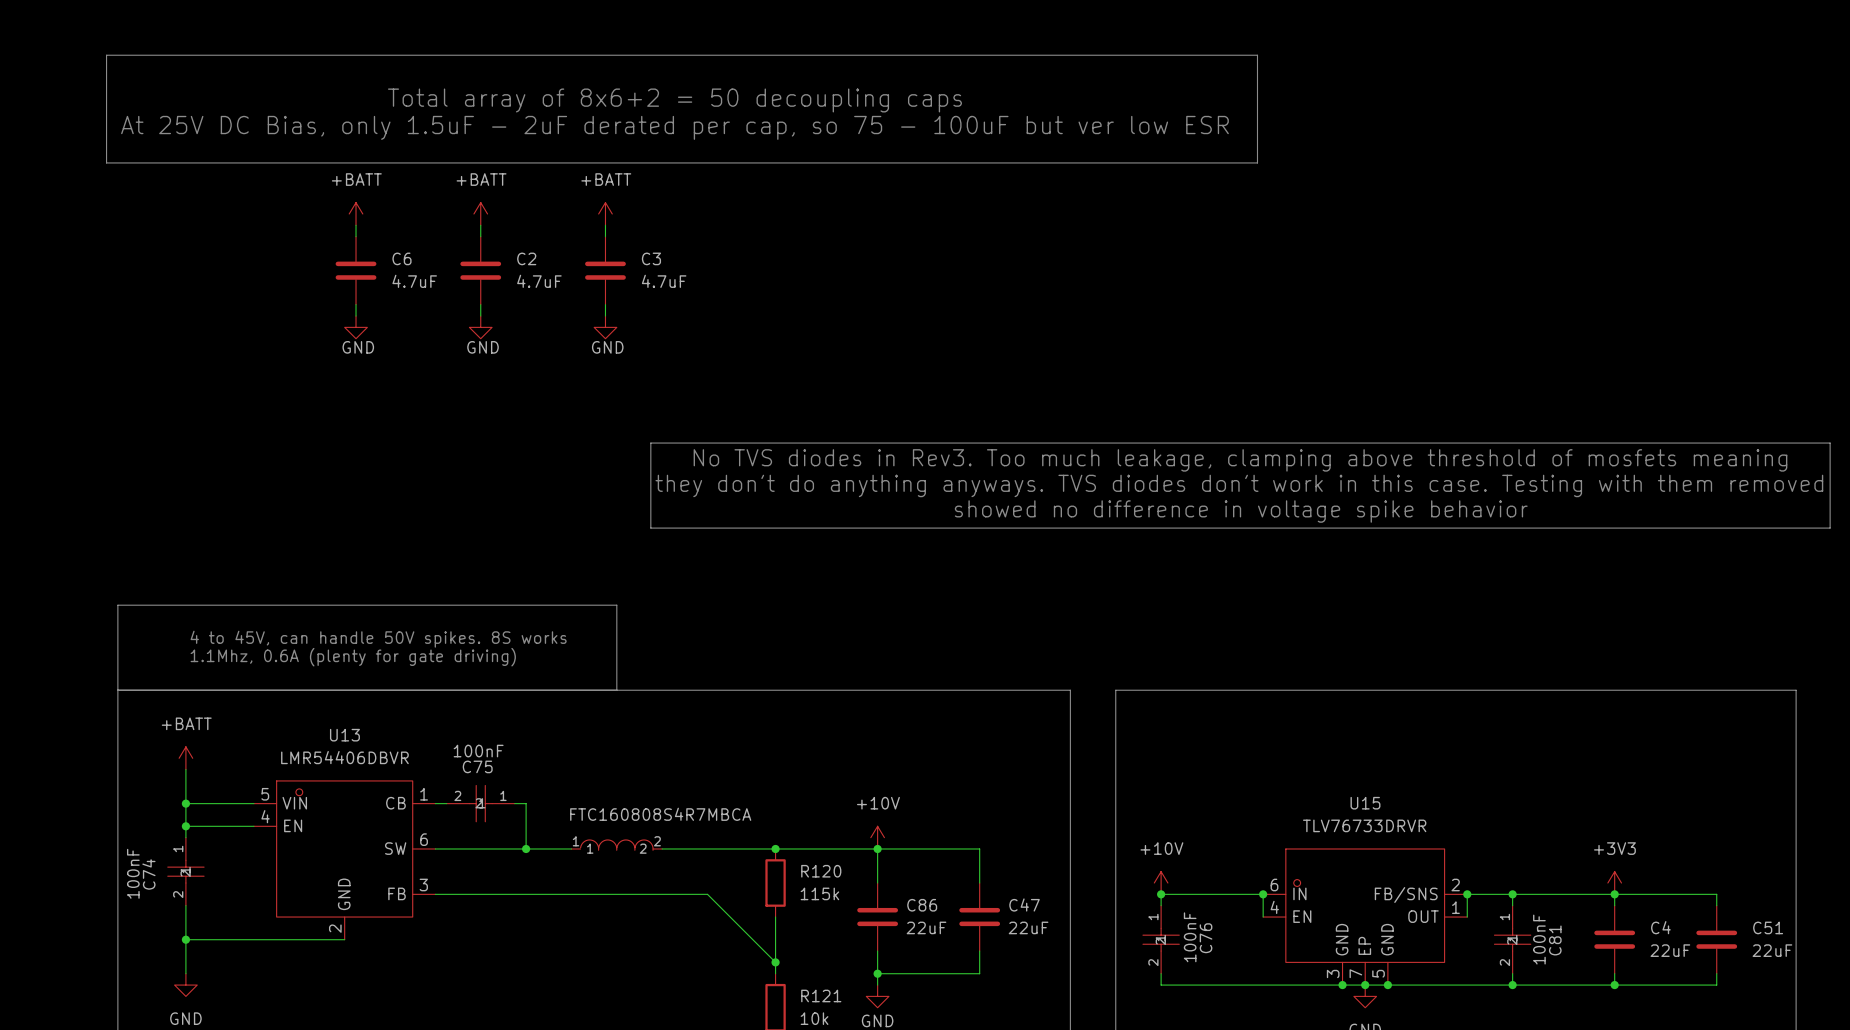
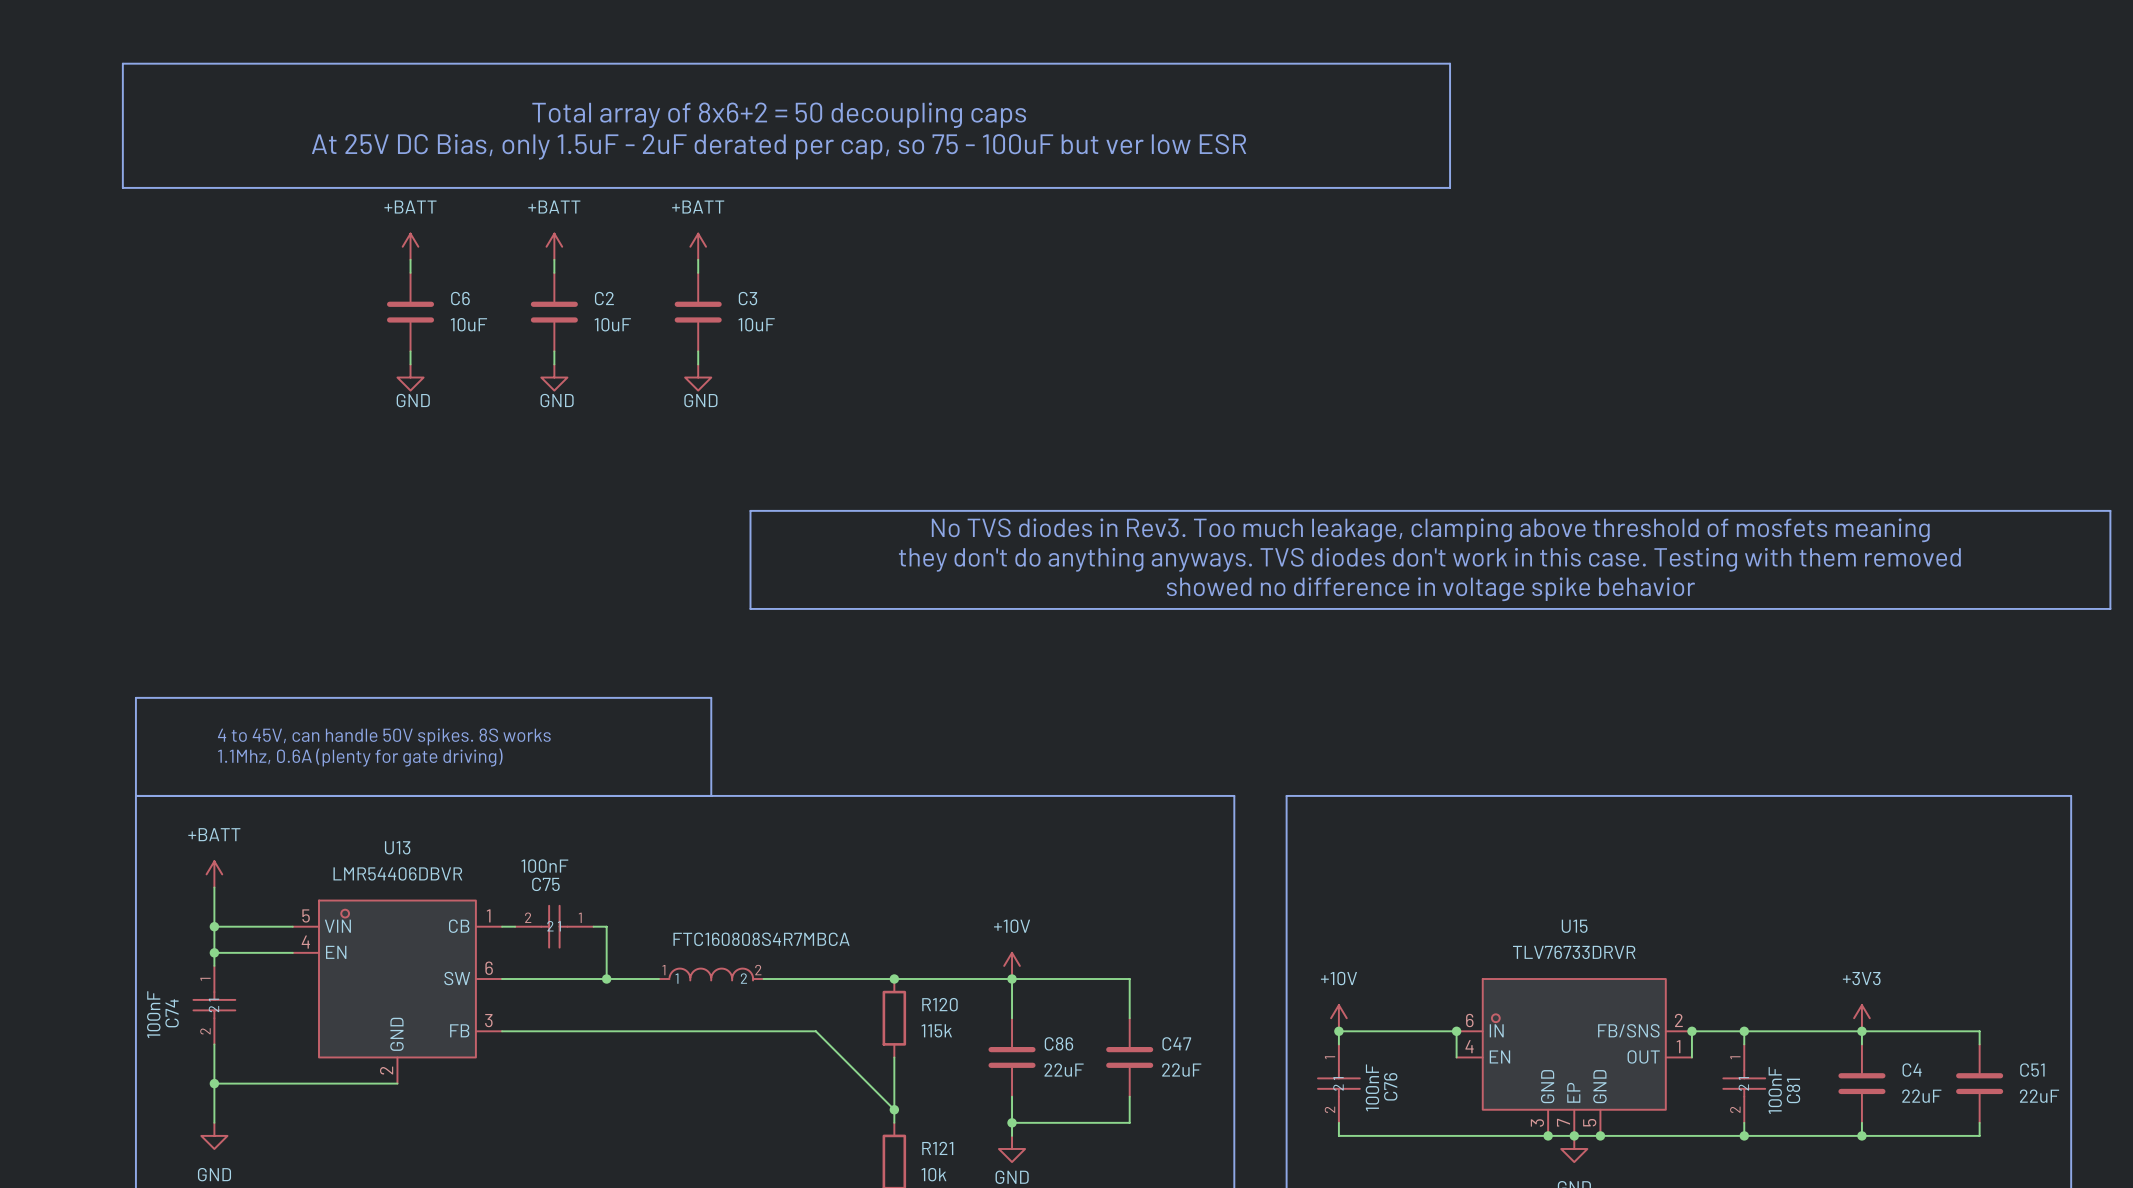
C6 value: 4.7uF (414, 281) -> 10uF (468, 324)
C2 value: 4.7uF (539, 281) -> 10uF (612, 324)
C3 value: 4.7uF (664, 281) -> 10uF (756, 324)

